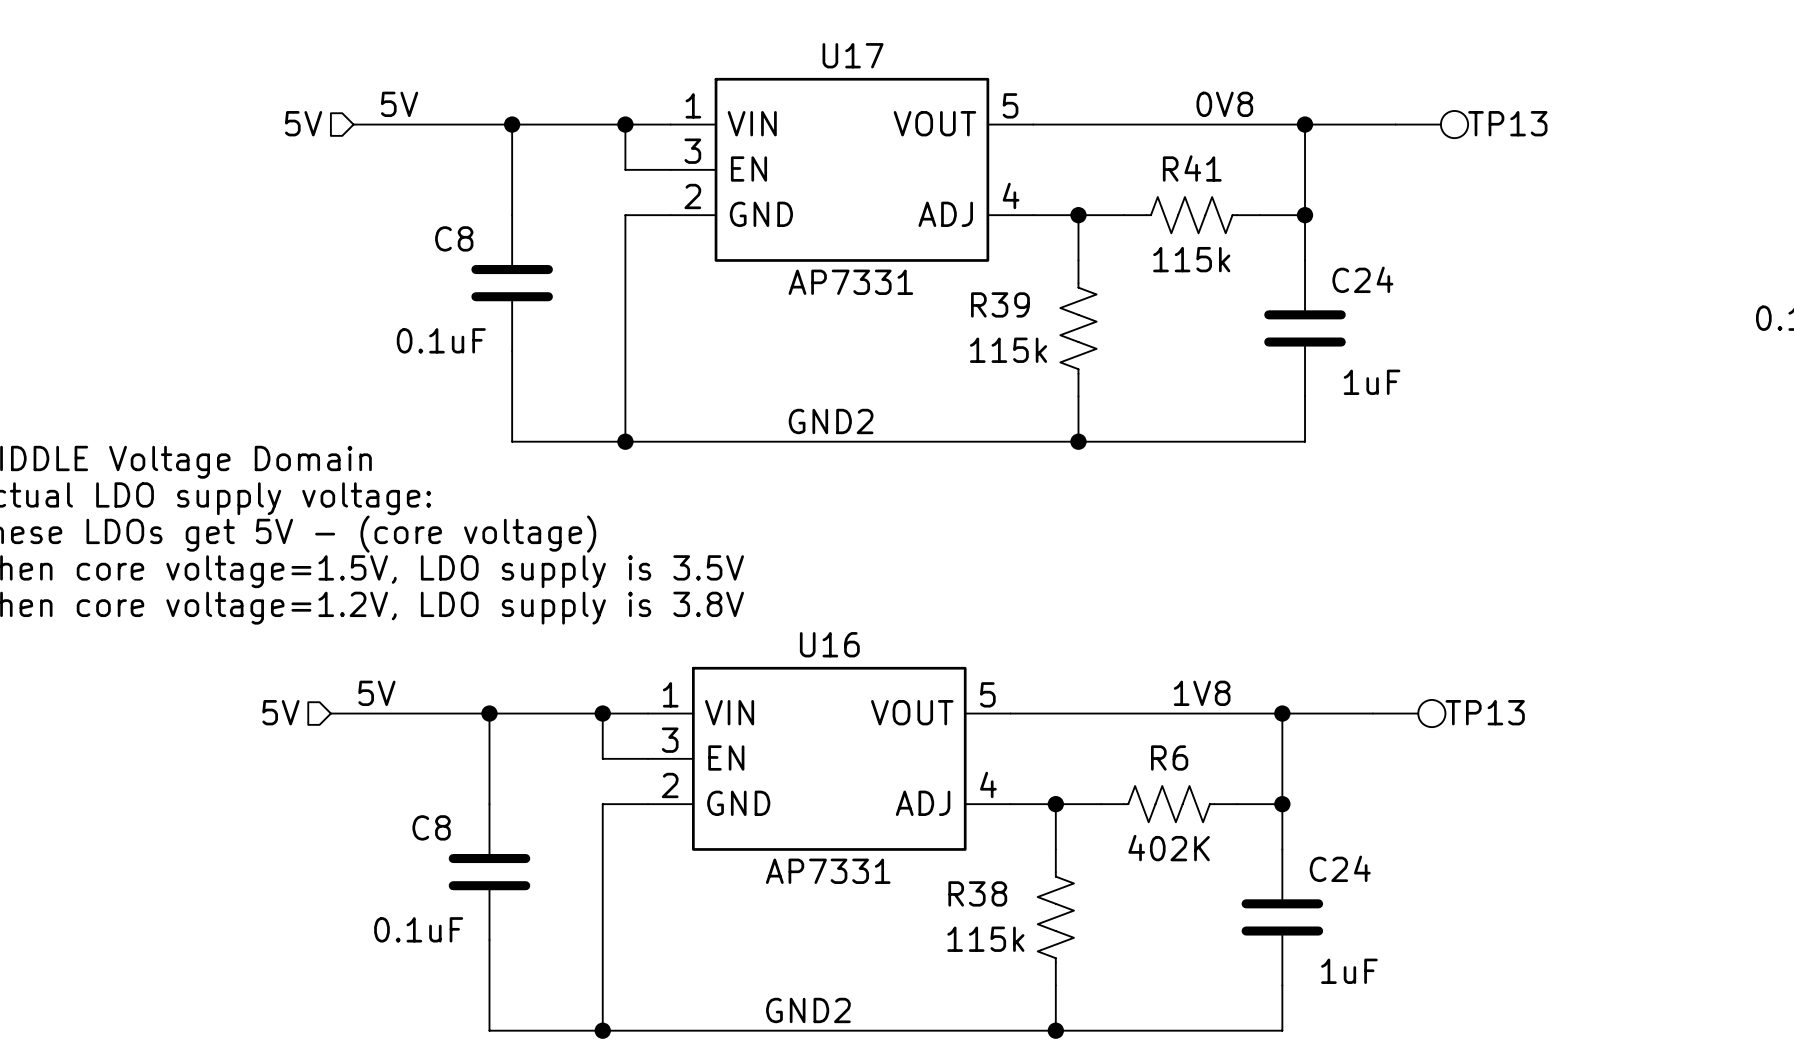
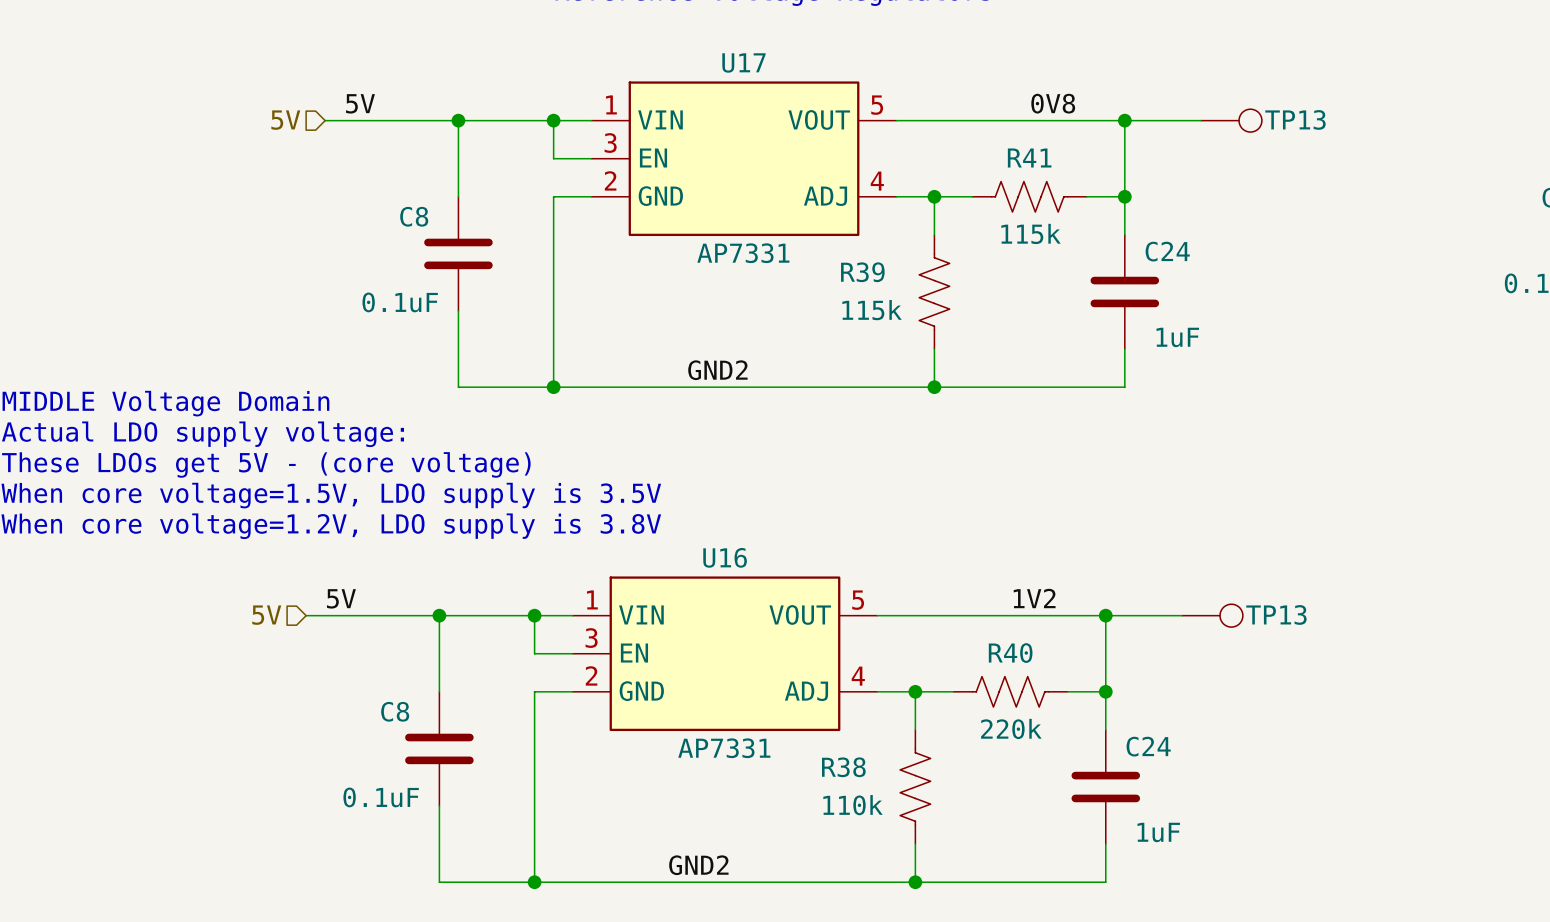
label: 1V8 (1202, 693) -> 1V2 (1034, 598)
R6 name: R6 (1169, 758) -> R40 (1010, 653)
R6 value: 402K (1169, 848) -> 220k (1011, 728)
R38 value: 115k (985, 939) -> 110k (853, 805)

